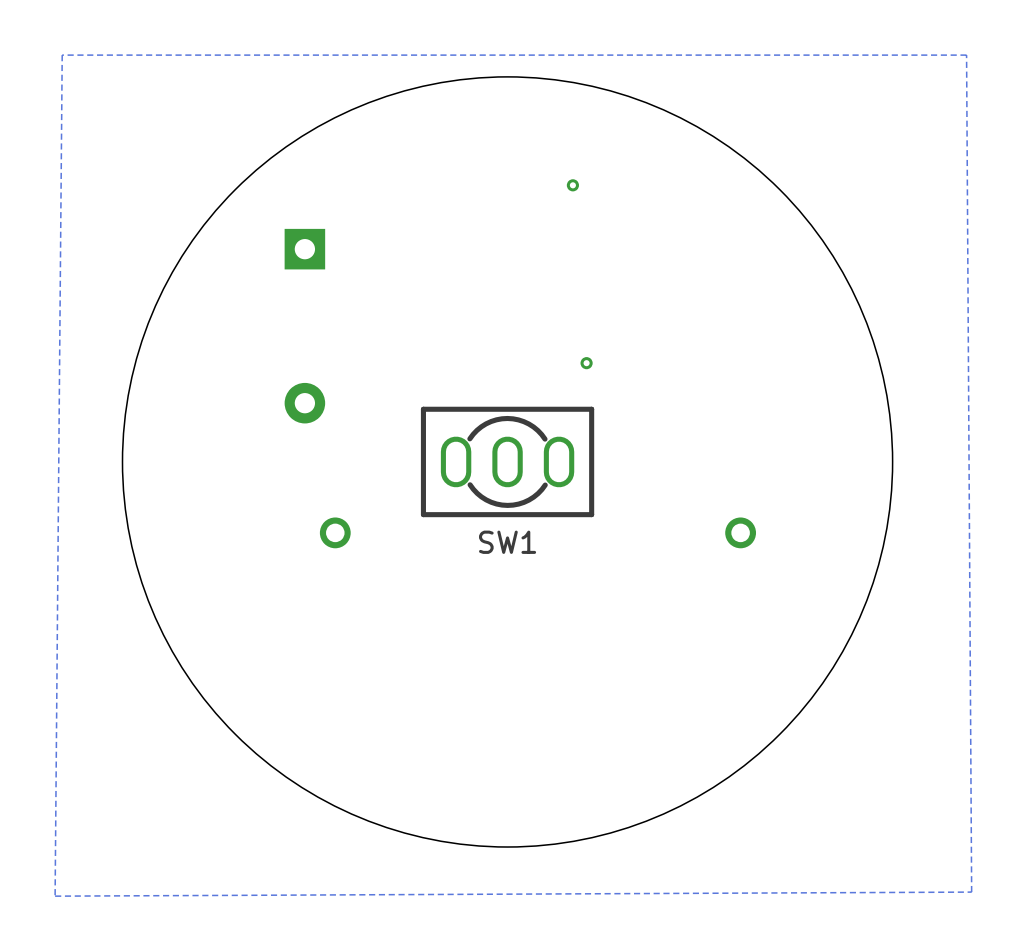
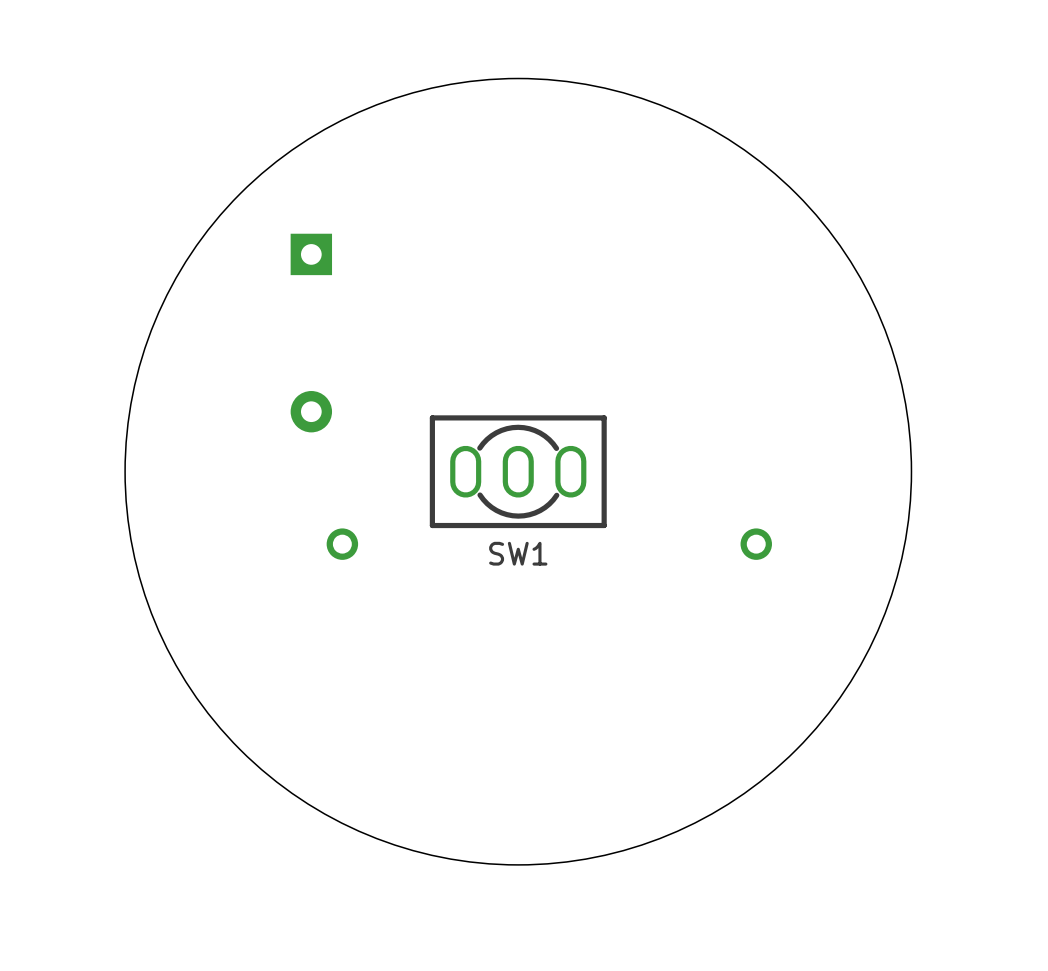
zone outline: (966, 55) (62, 55) (55, 896) (971, 892) (966, 55) -> none
via: (572, 185) -> none
via: (586, 363) -> none

